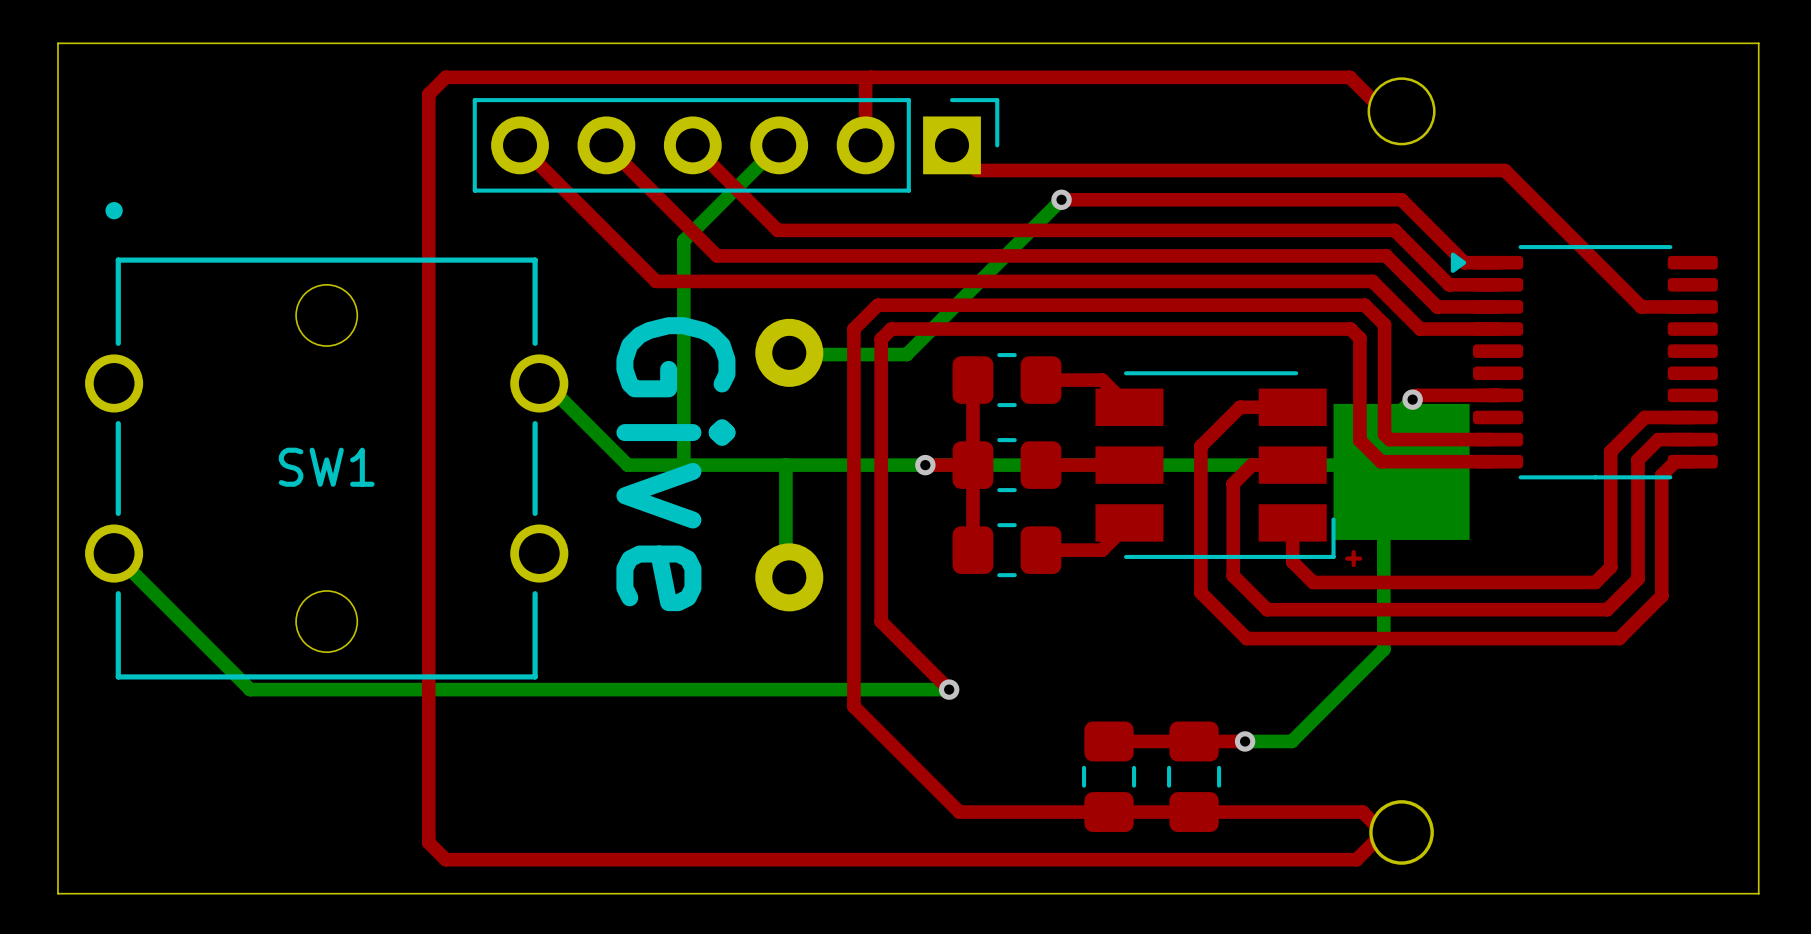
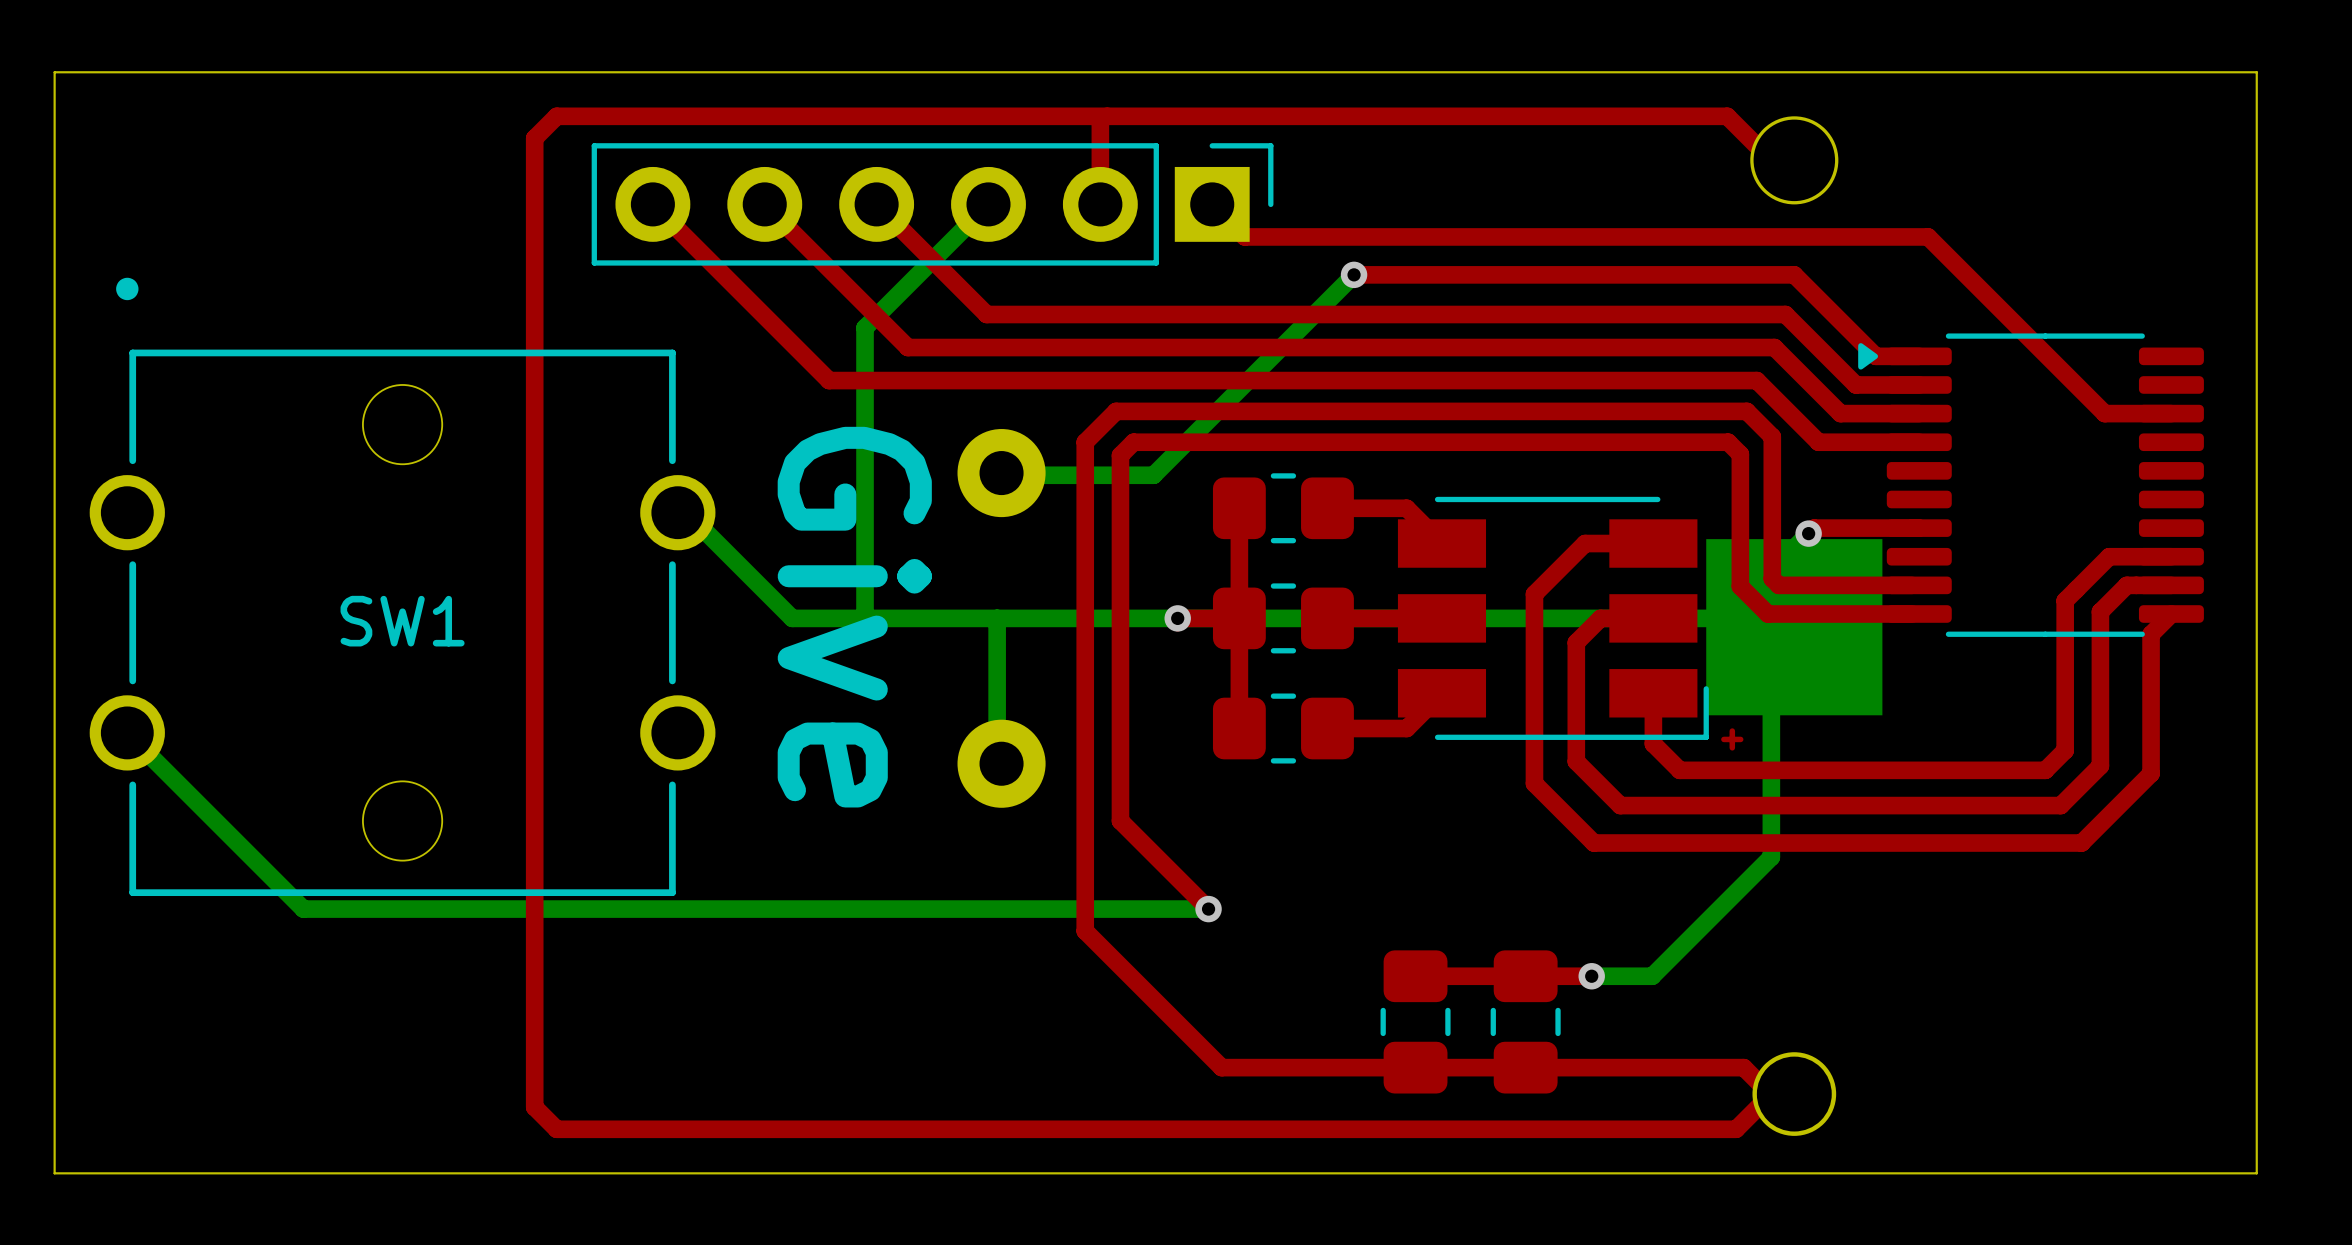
top track: (1692, 461) (1675, 461) (1661, 475) (1661, 596) (1619, 638) -> (2171, 613) (2151, 634) (2151, 773) (2081, 843) (2076, 843)

